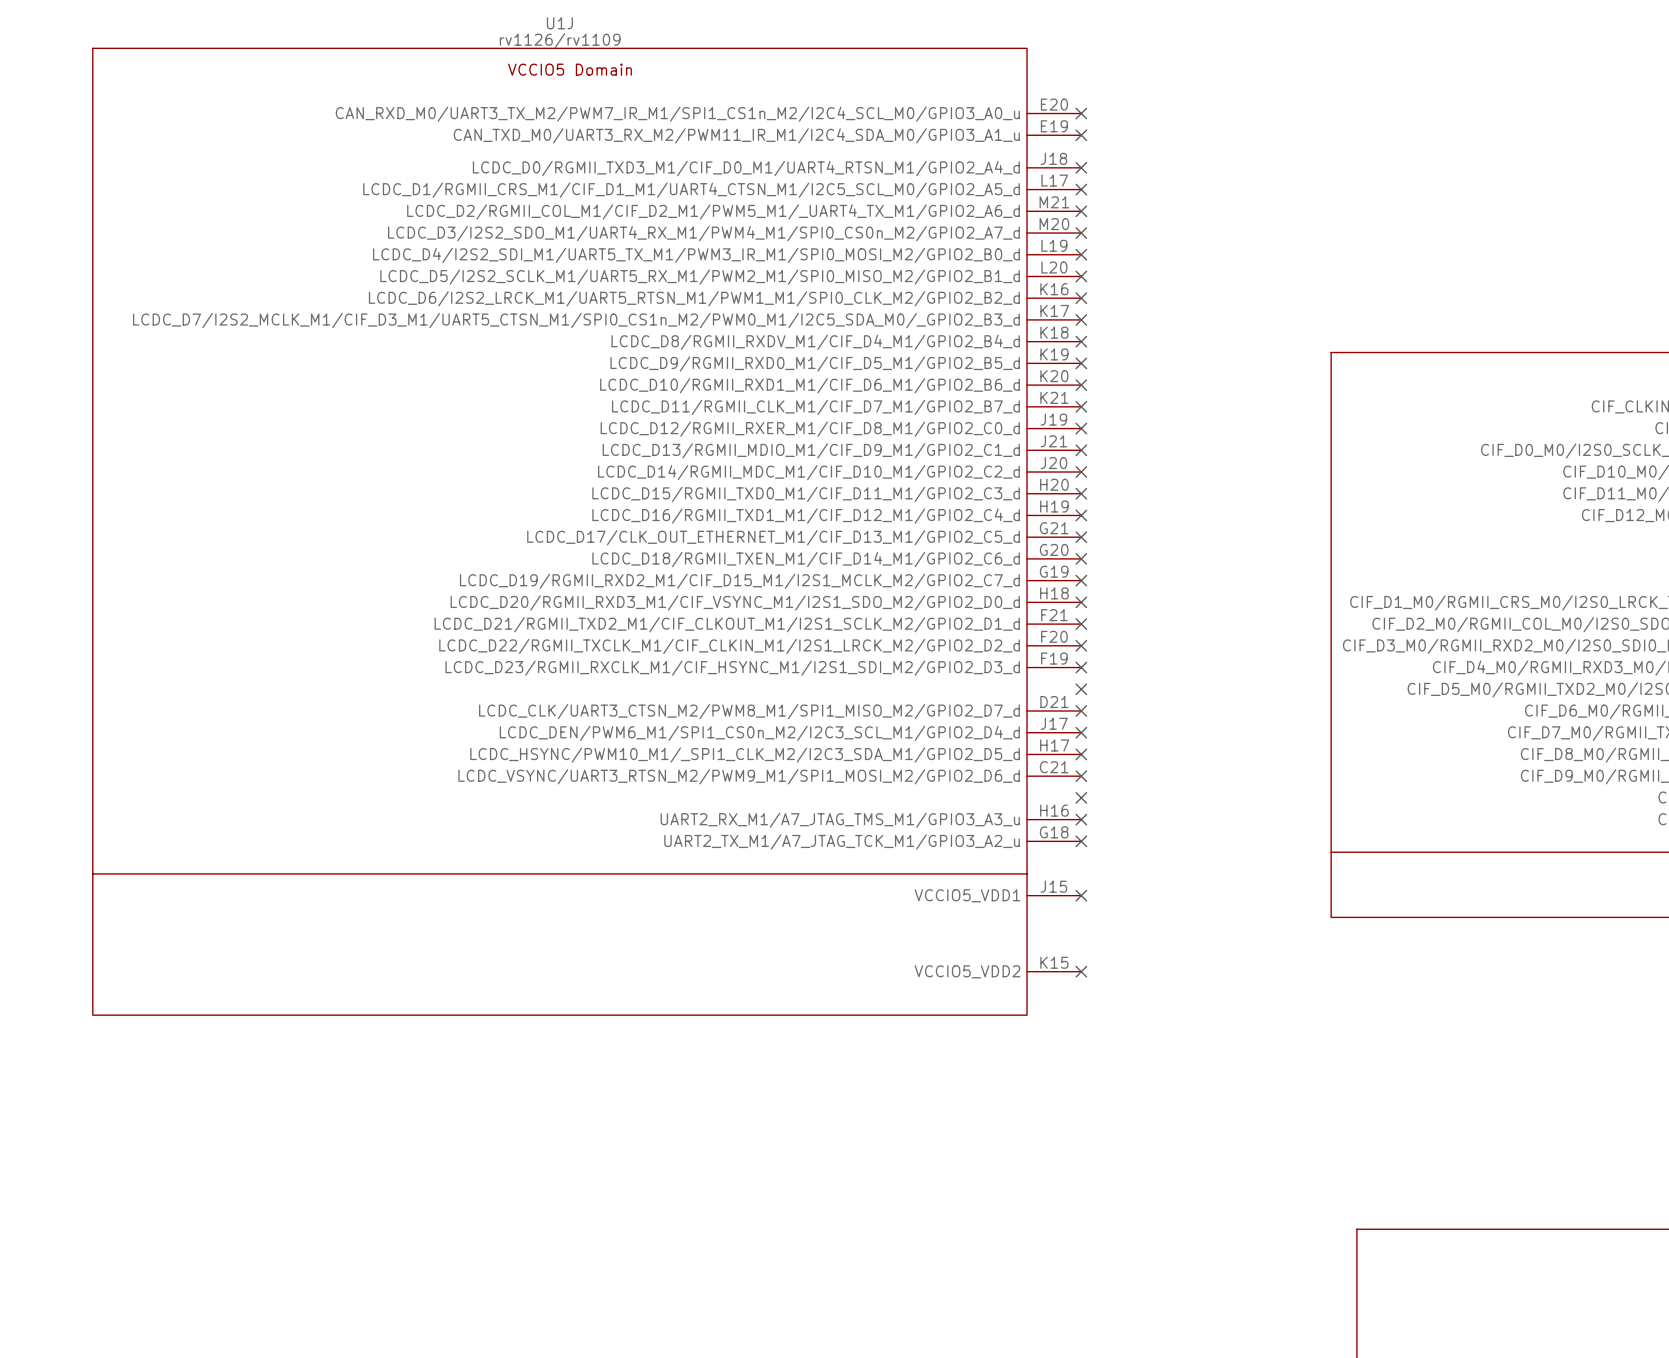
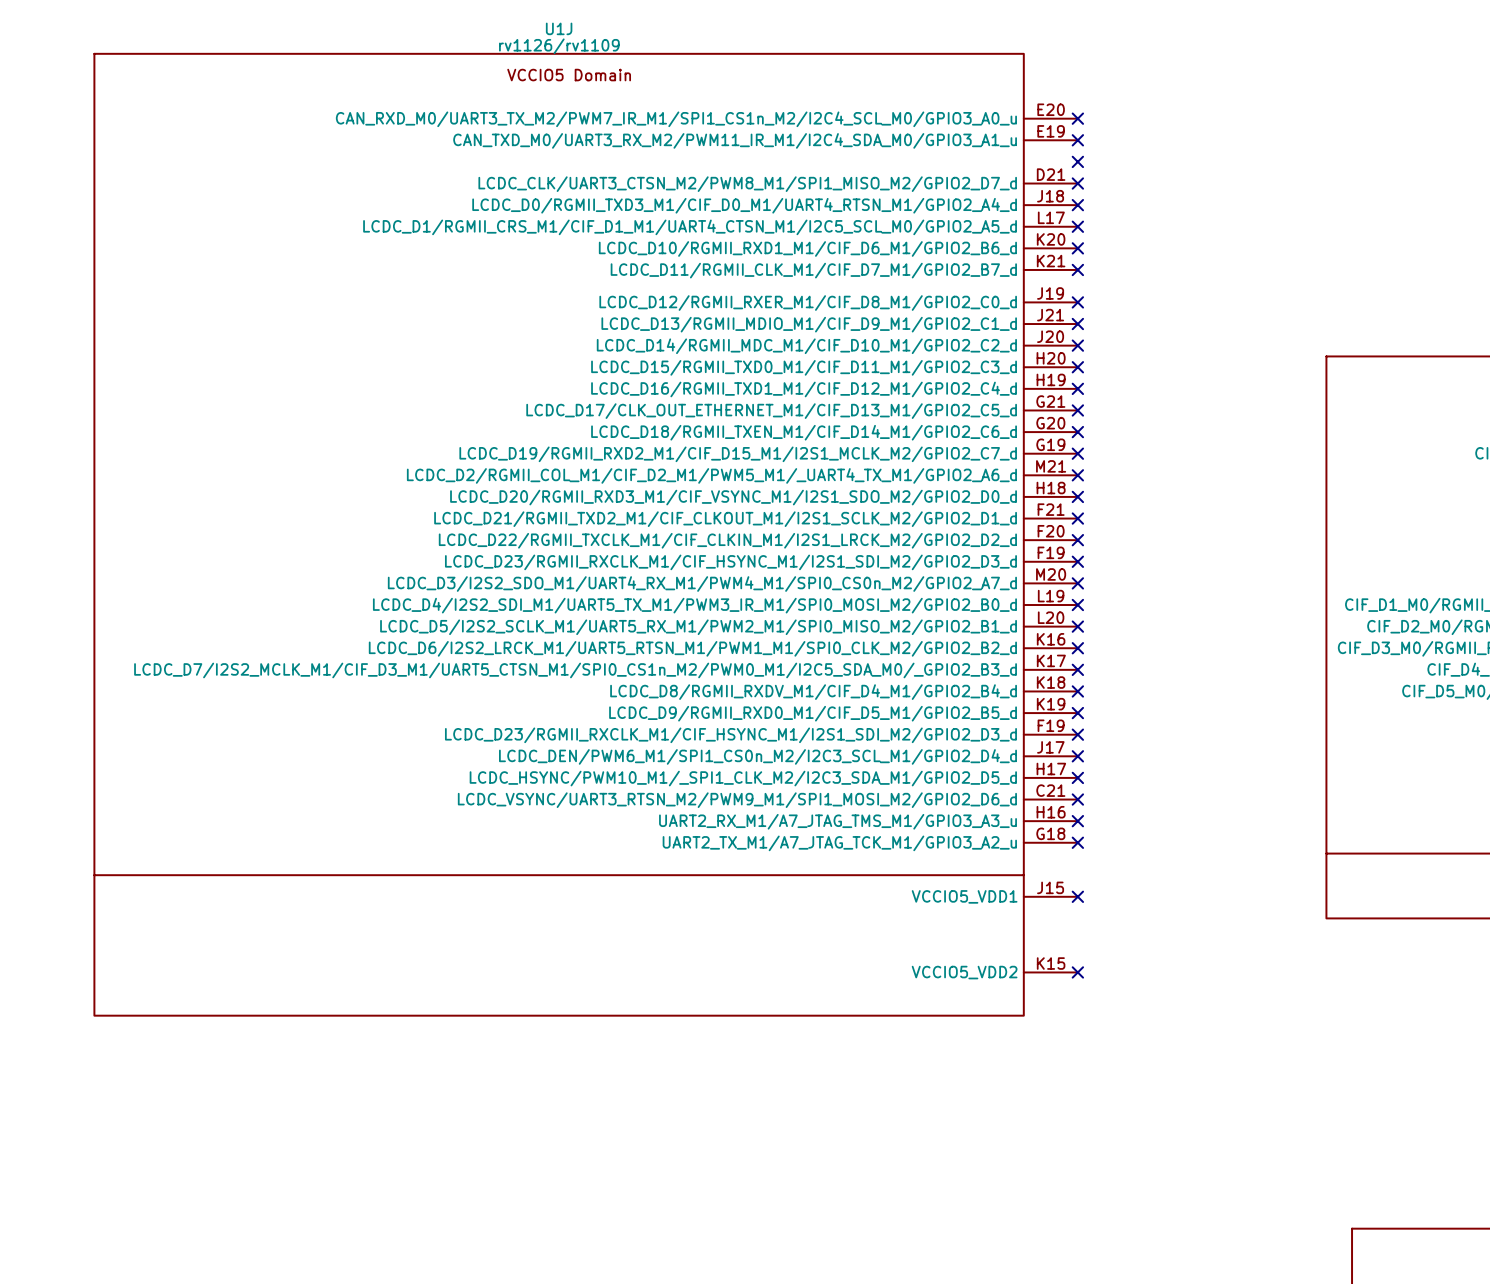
U1J symbol: [92, 48, 1082, 1016] -> [94, 53, 1078, 1016]
no-connect mark: none -> (1077, 161)
no-connect mark: (1081, 167) -> none
no-connect mark: none -> (1077, 183)
no-connect mark: (1081, 189) -> none
no-connect mark: none -> (1077, 205)
no-connect mark: (1081, 211) -> none
no-connect mark: none -> (1077, 226)
no-connect mark: (1081, 233) -> none
no-connect mark: none -> (1077, 248)
no-connect mark: (1081, 254) -> none
no-connect mark: none -> (1077, 269)
no-connect mark: (1081, 276) -> none

